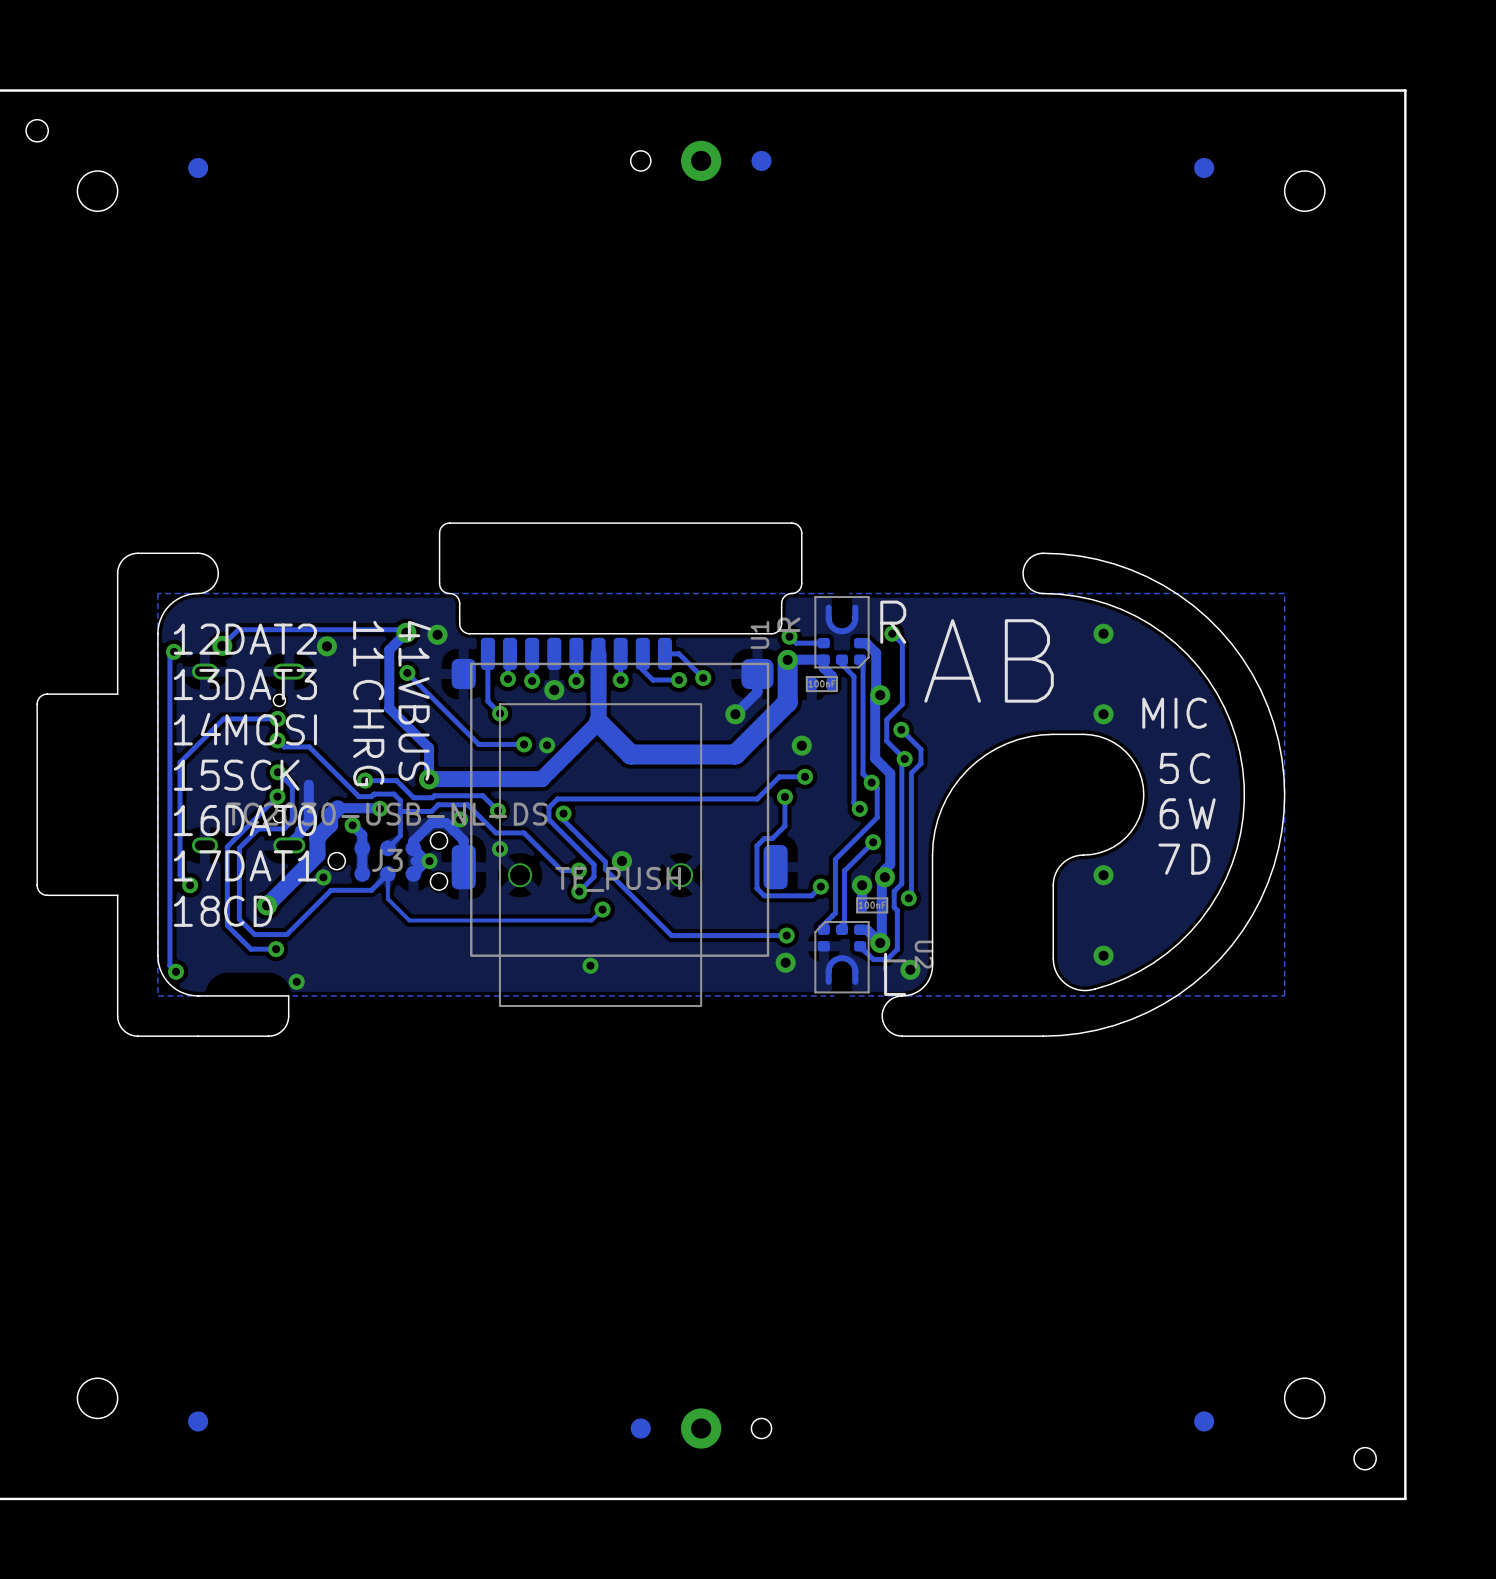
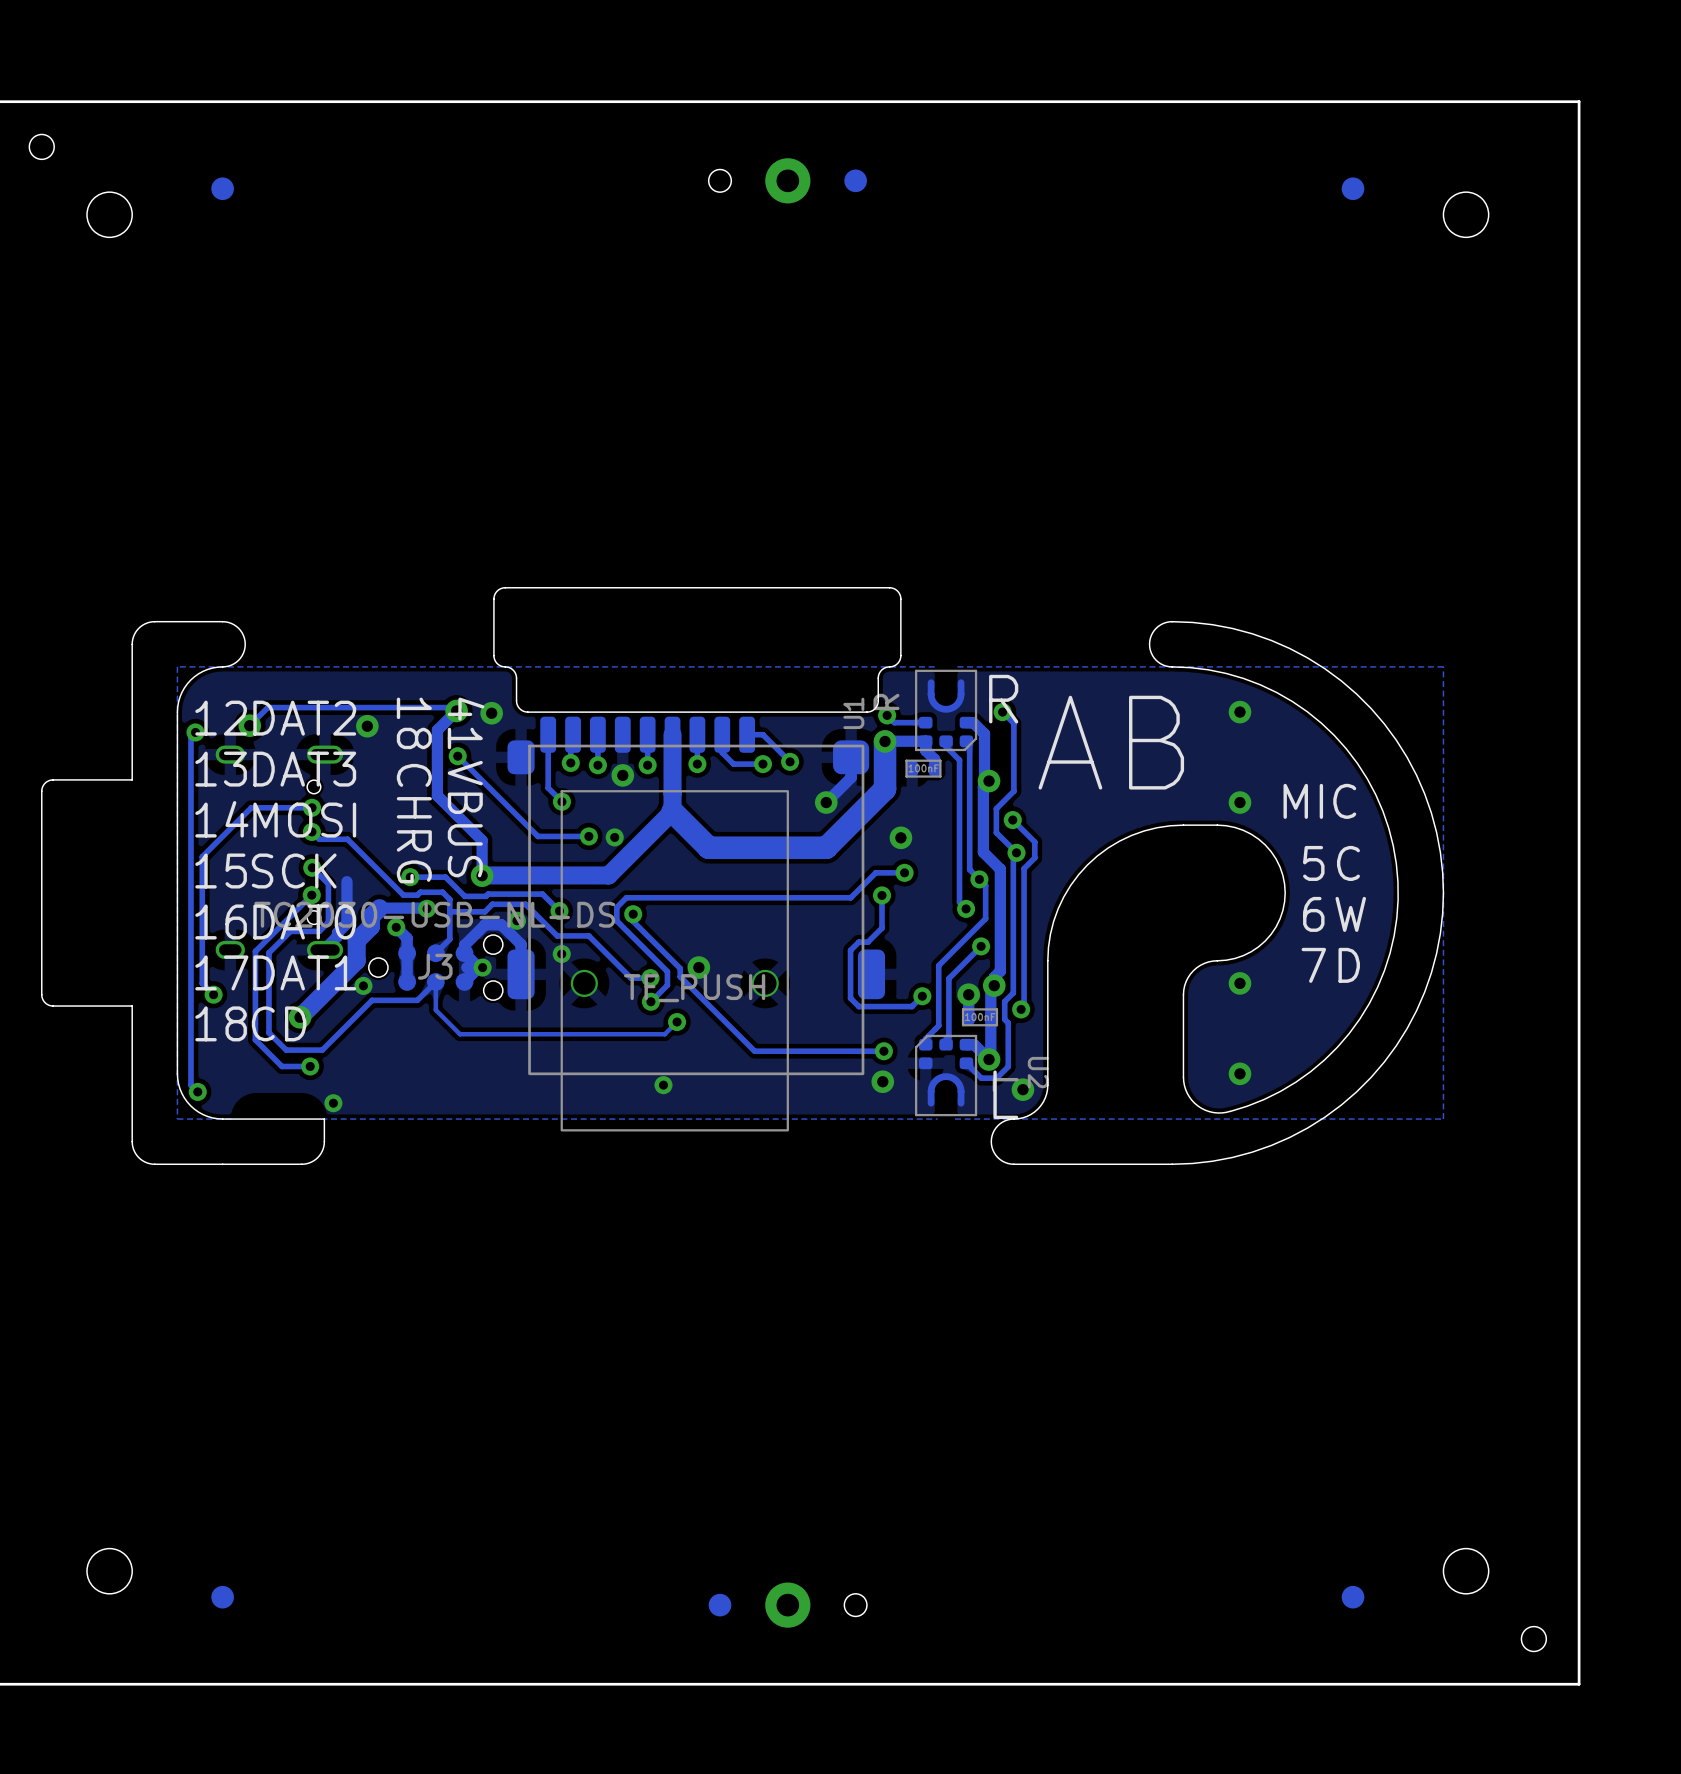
text: 11 (368, 643) -> 18 (414, 723)

